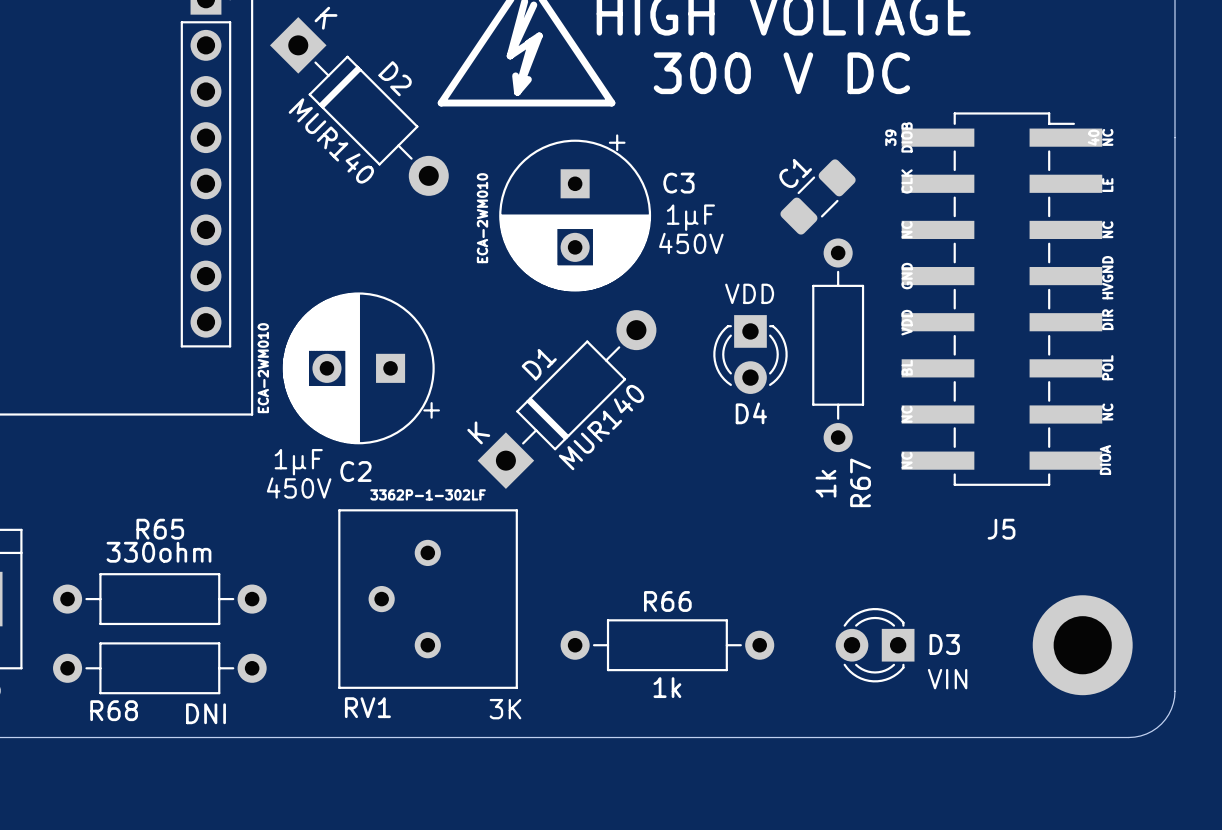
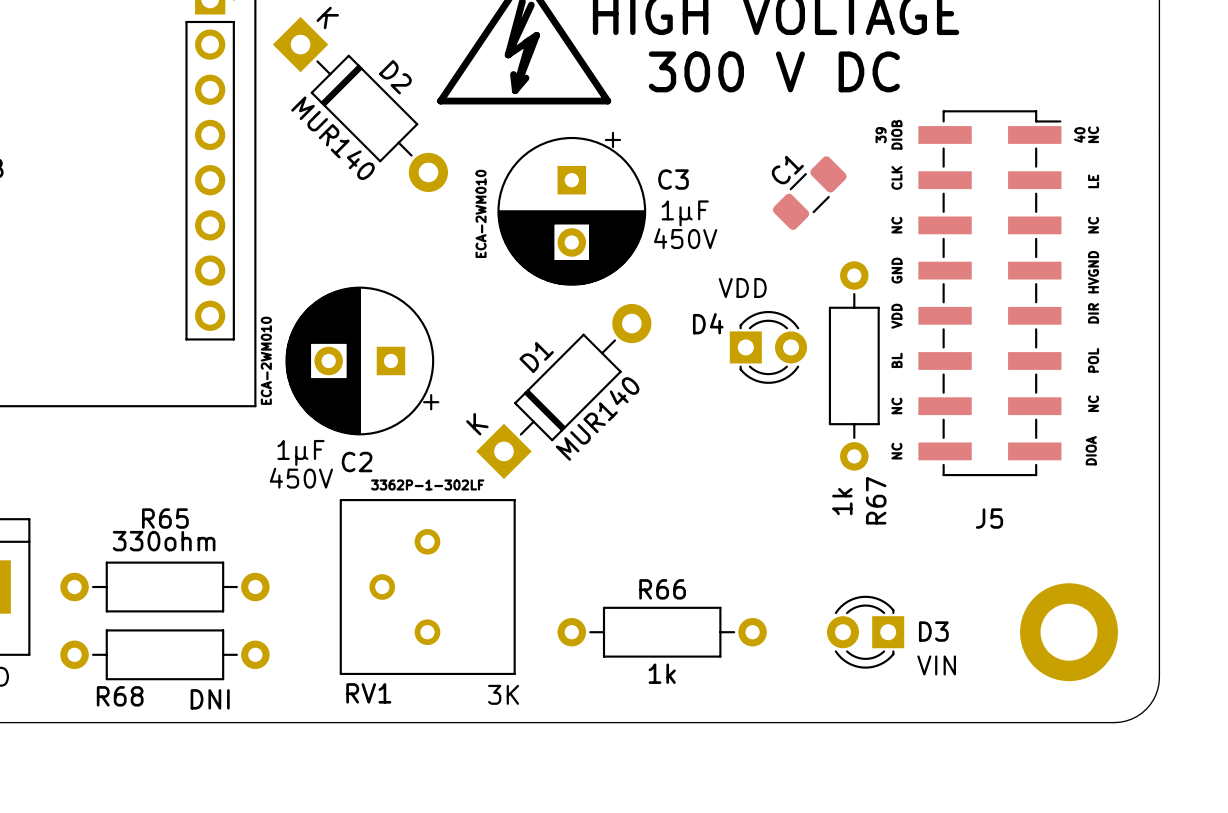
J5 footprint: [901, 112, 1103, 486] -> [918, 110, 1062, 477]
R67 position: (838, 345) -> (854, 365)
D4 rotation: 0° (750, 354) -> 90° counterclockwise (768, 347)
D4 name position: D4 (751, 413) -> D4 (708, 323)

